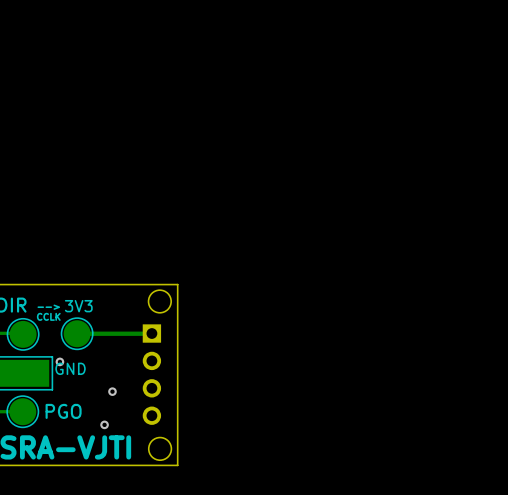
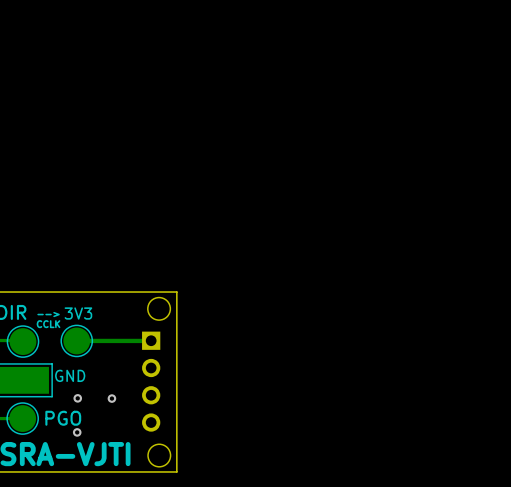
via: (59, 361) -> none
via: none -> (77, 398)
via: (104, 424) -> none
via: none -> (77, 432)

